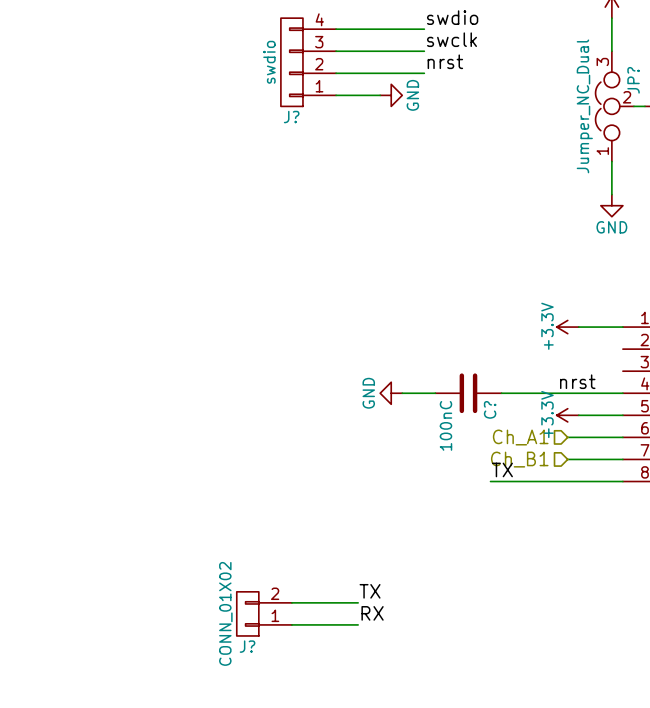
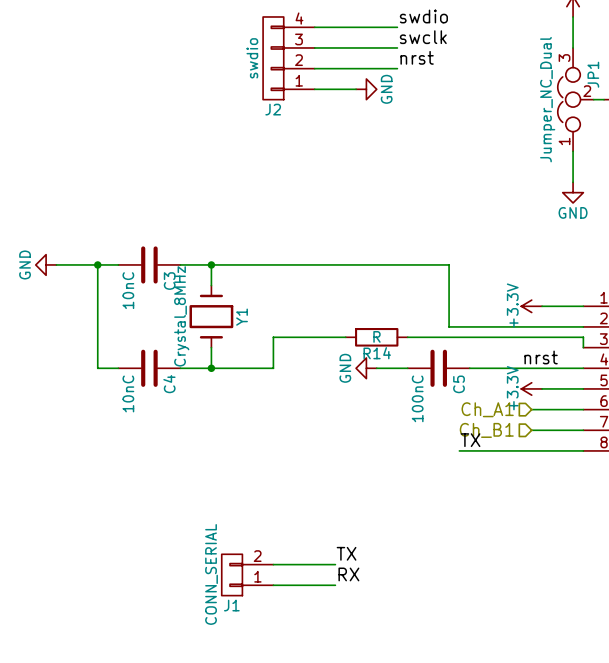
JP? name: JP? (633, 80) -> JP1 (593, 74)
J? name: J? (291, 117) -> J2 (273, 109)
power symbol: none -> GND (46, 264)
wire: none -> (56, 264) (118, 264)
wire: none -> (97, 264) (97, 368) (118, 368)
junction: none -> (97, 264)
C3: none -> 10nC (149, 264)
wire: none -> (180, 264) (449, 264) (449, 326) (583, 326)
wire: none -> (211, 264) (211, 285)
junction: none -> (211, 264)
Y1: none -> Crystal_8MHz (211, 316)
wire: none -> (345, 337) (273, 337) (273, 368) (180, 368)
R14: none -> R (376, 337)
wire: none -> (407, 337) (583, 337) (583, 347)
wire: none -> (211, 347) (211, 368)
C4: none -> 10nC (149, 368)
junction: none -> (211, 368)
C? name: C? (490, 409) -> C5 (459, 384)
J? value: CONN_01X02 (225, 613) -> CONN_SERIAL (211, 574)
J? name: J? (247, 646) -> J1 (231, 605)

